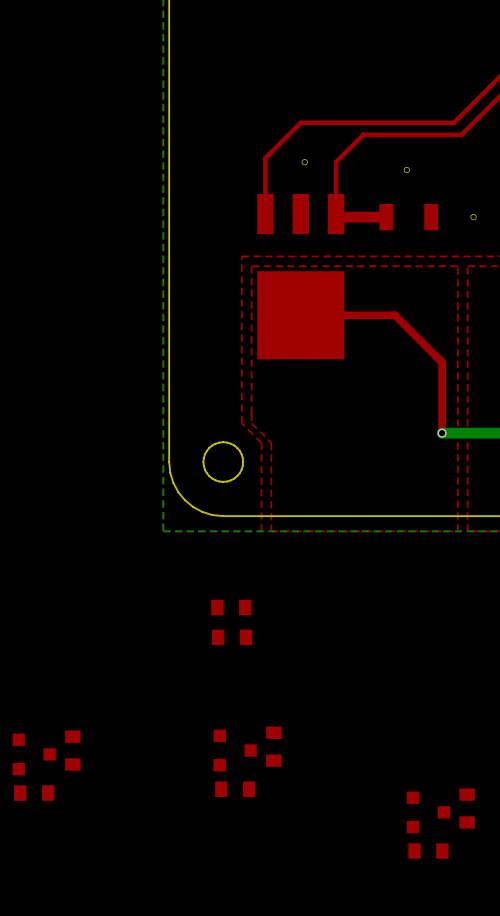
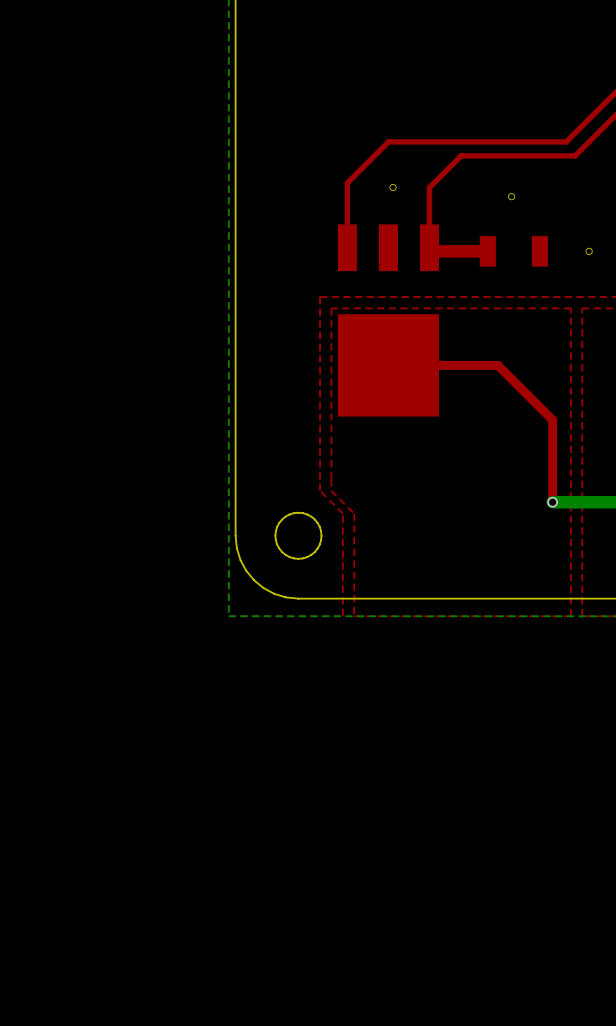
part: (231, 607) -> none
part: (232, 637) -> none
part: (273, 746) -> none
part: (72, 750) -> none
part: (235, 750) -> none
part: (34, 754) -> none
part: (235, 789) -> none
part: (34, 793) -> none
part: (467, 808) -> none
part: (428, 812) -> none
part: (428, 851) -> none

